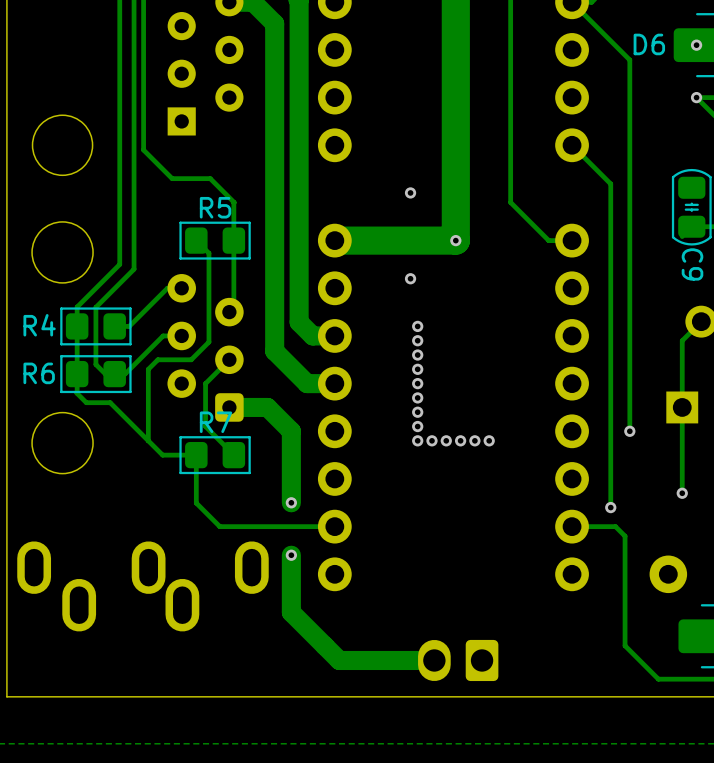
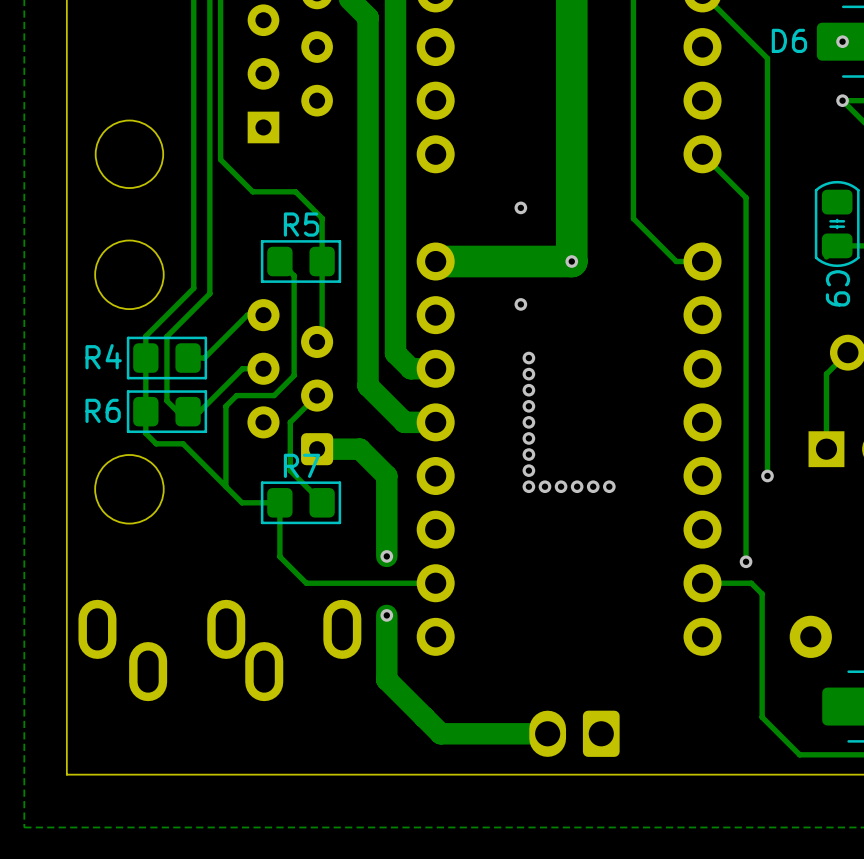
track: (682, 407) (682, 493) -> none
via: (682, 493) -> none

